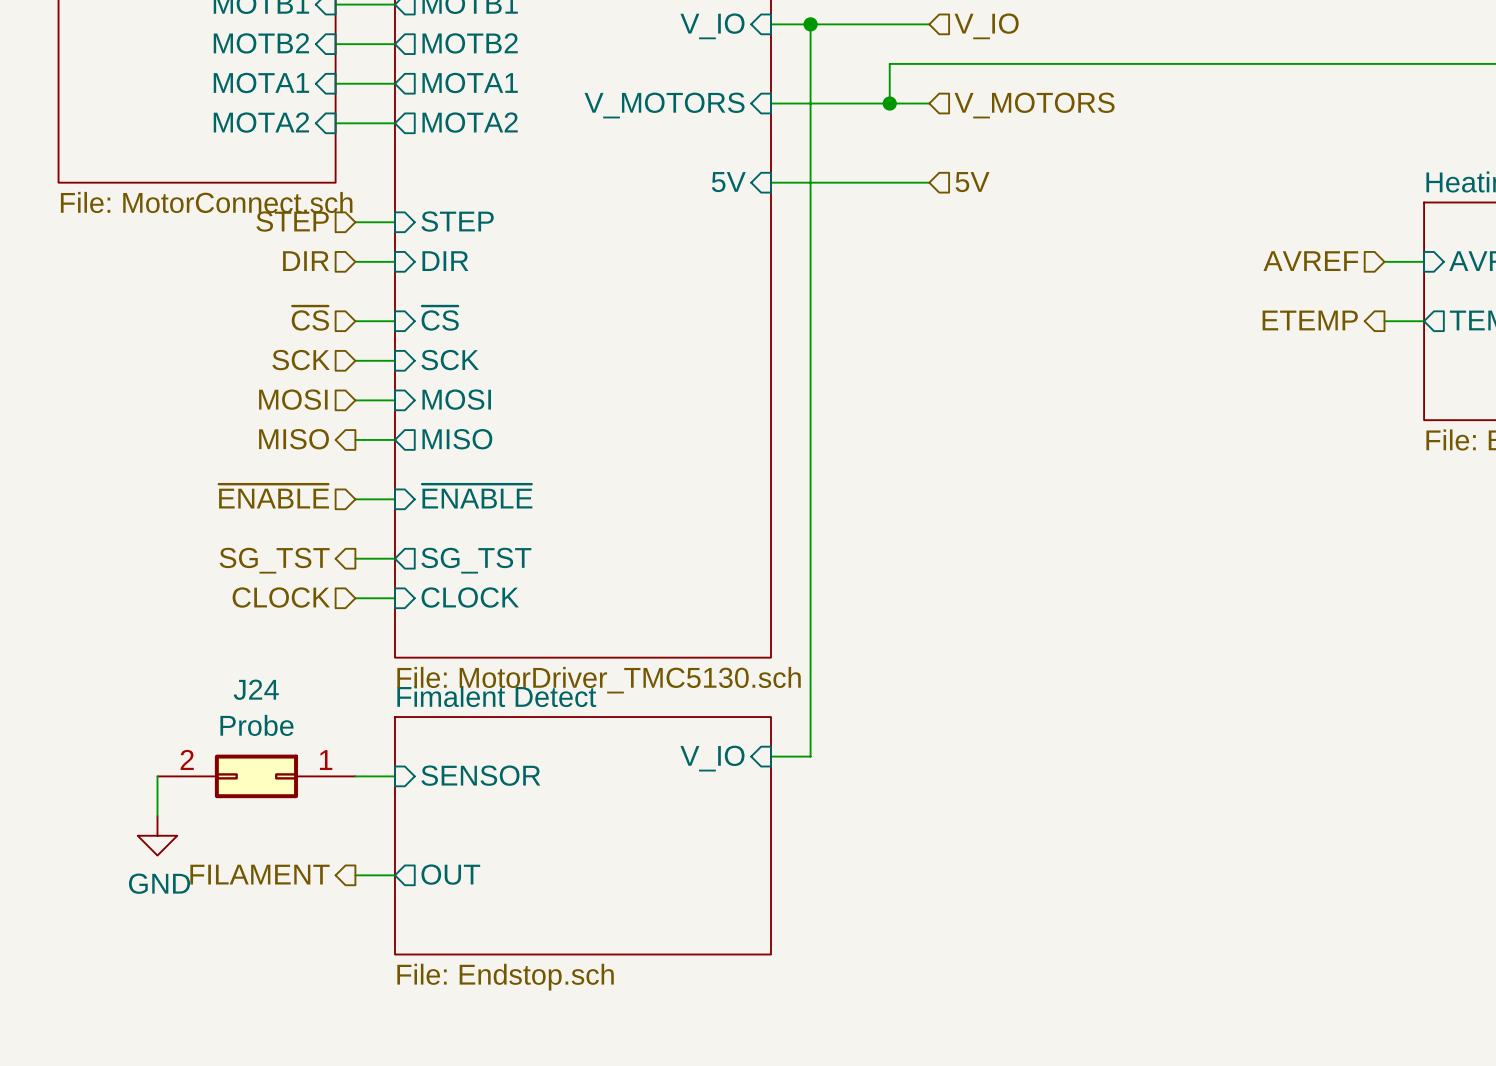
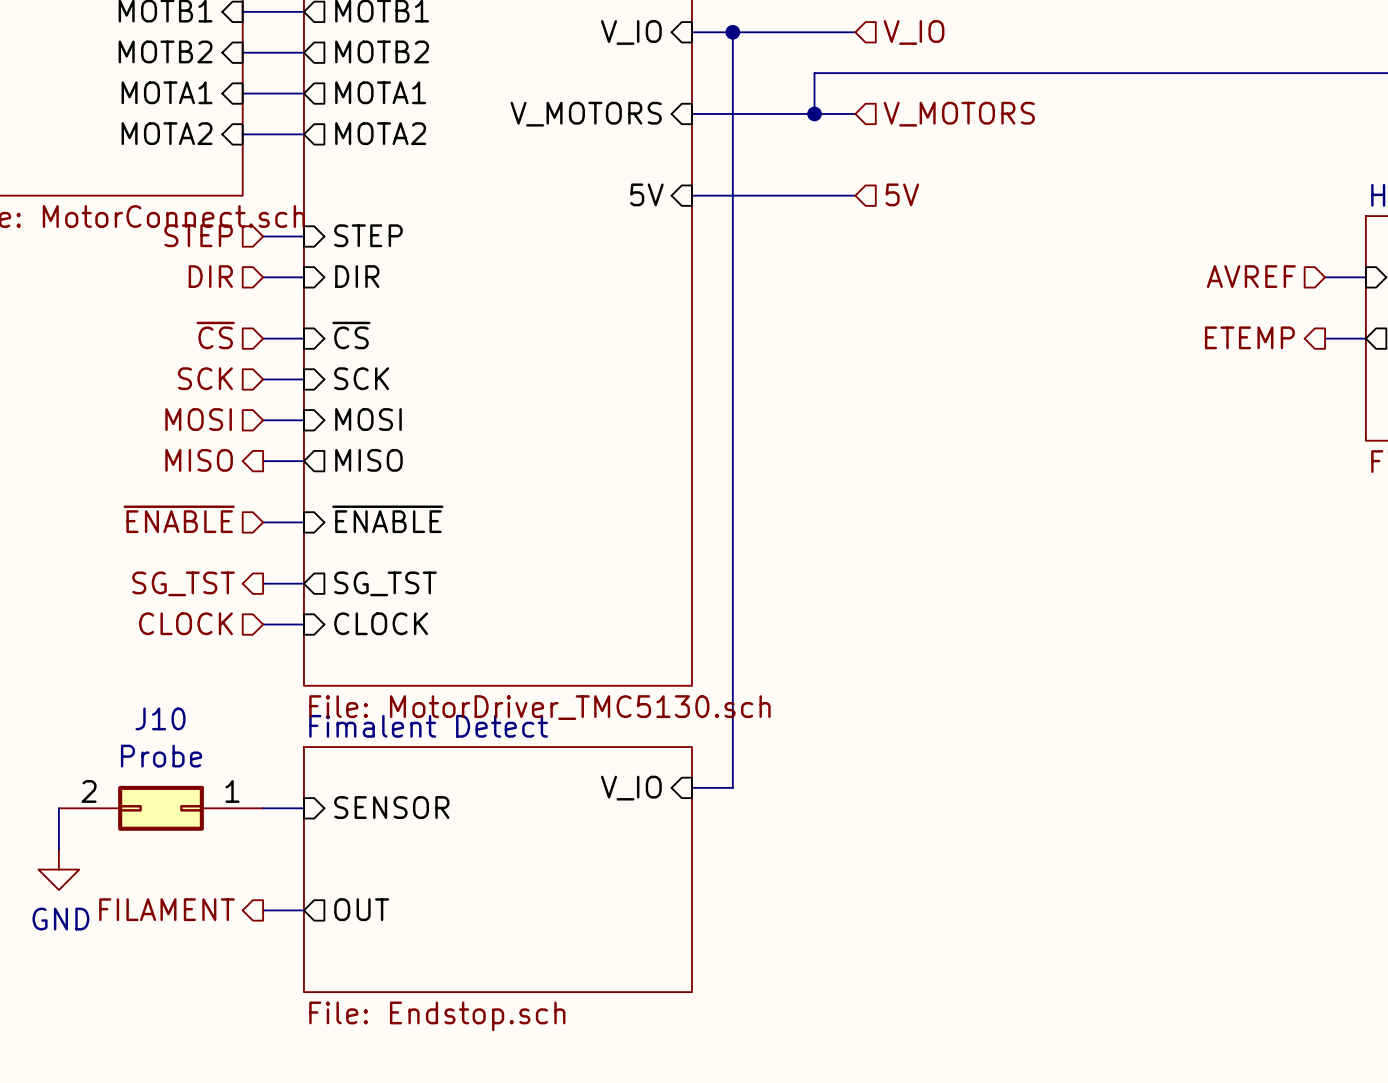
J24 name: J24 (256, 689) -> J10 (160, 718)

